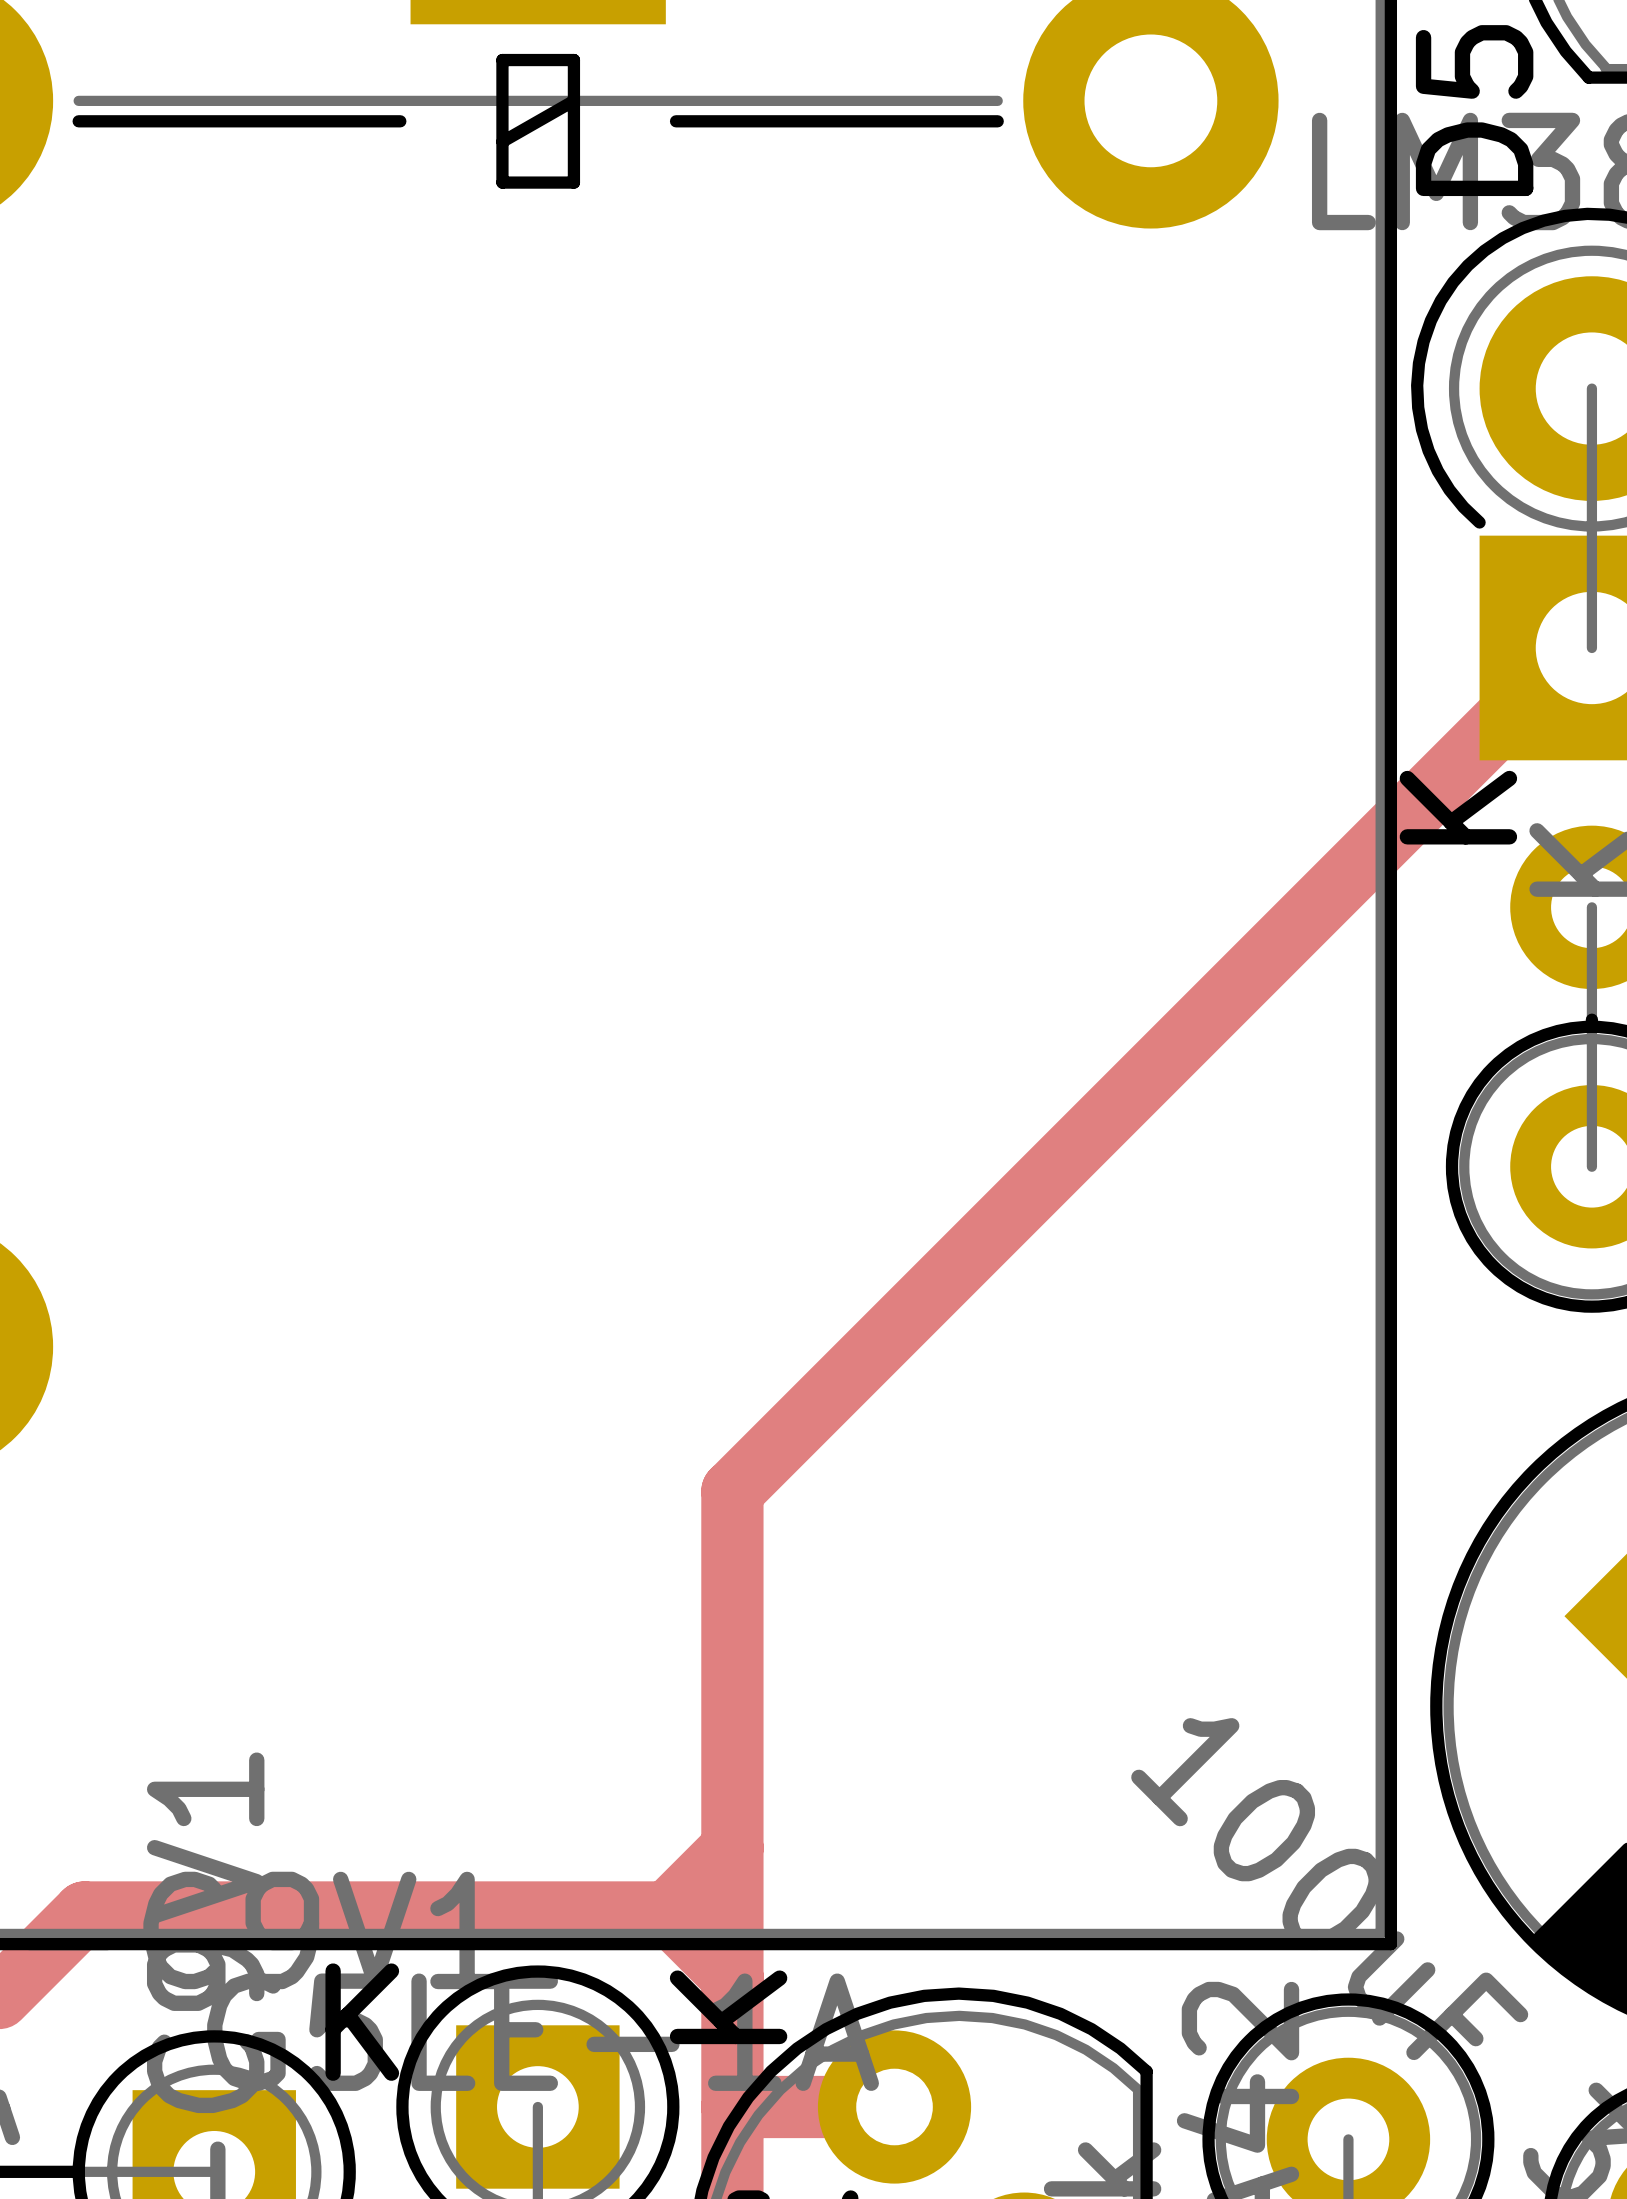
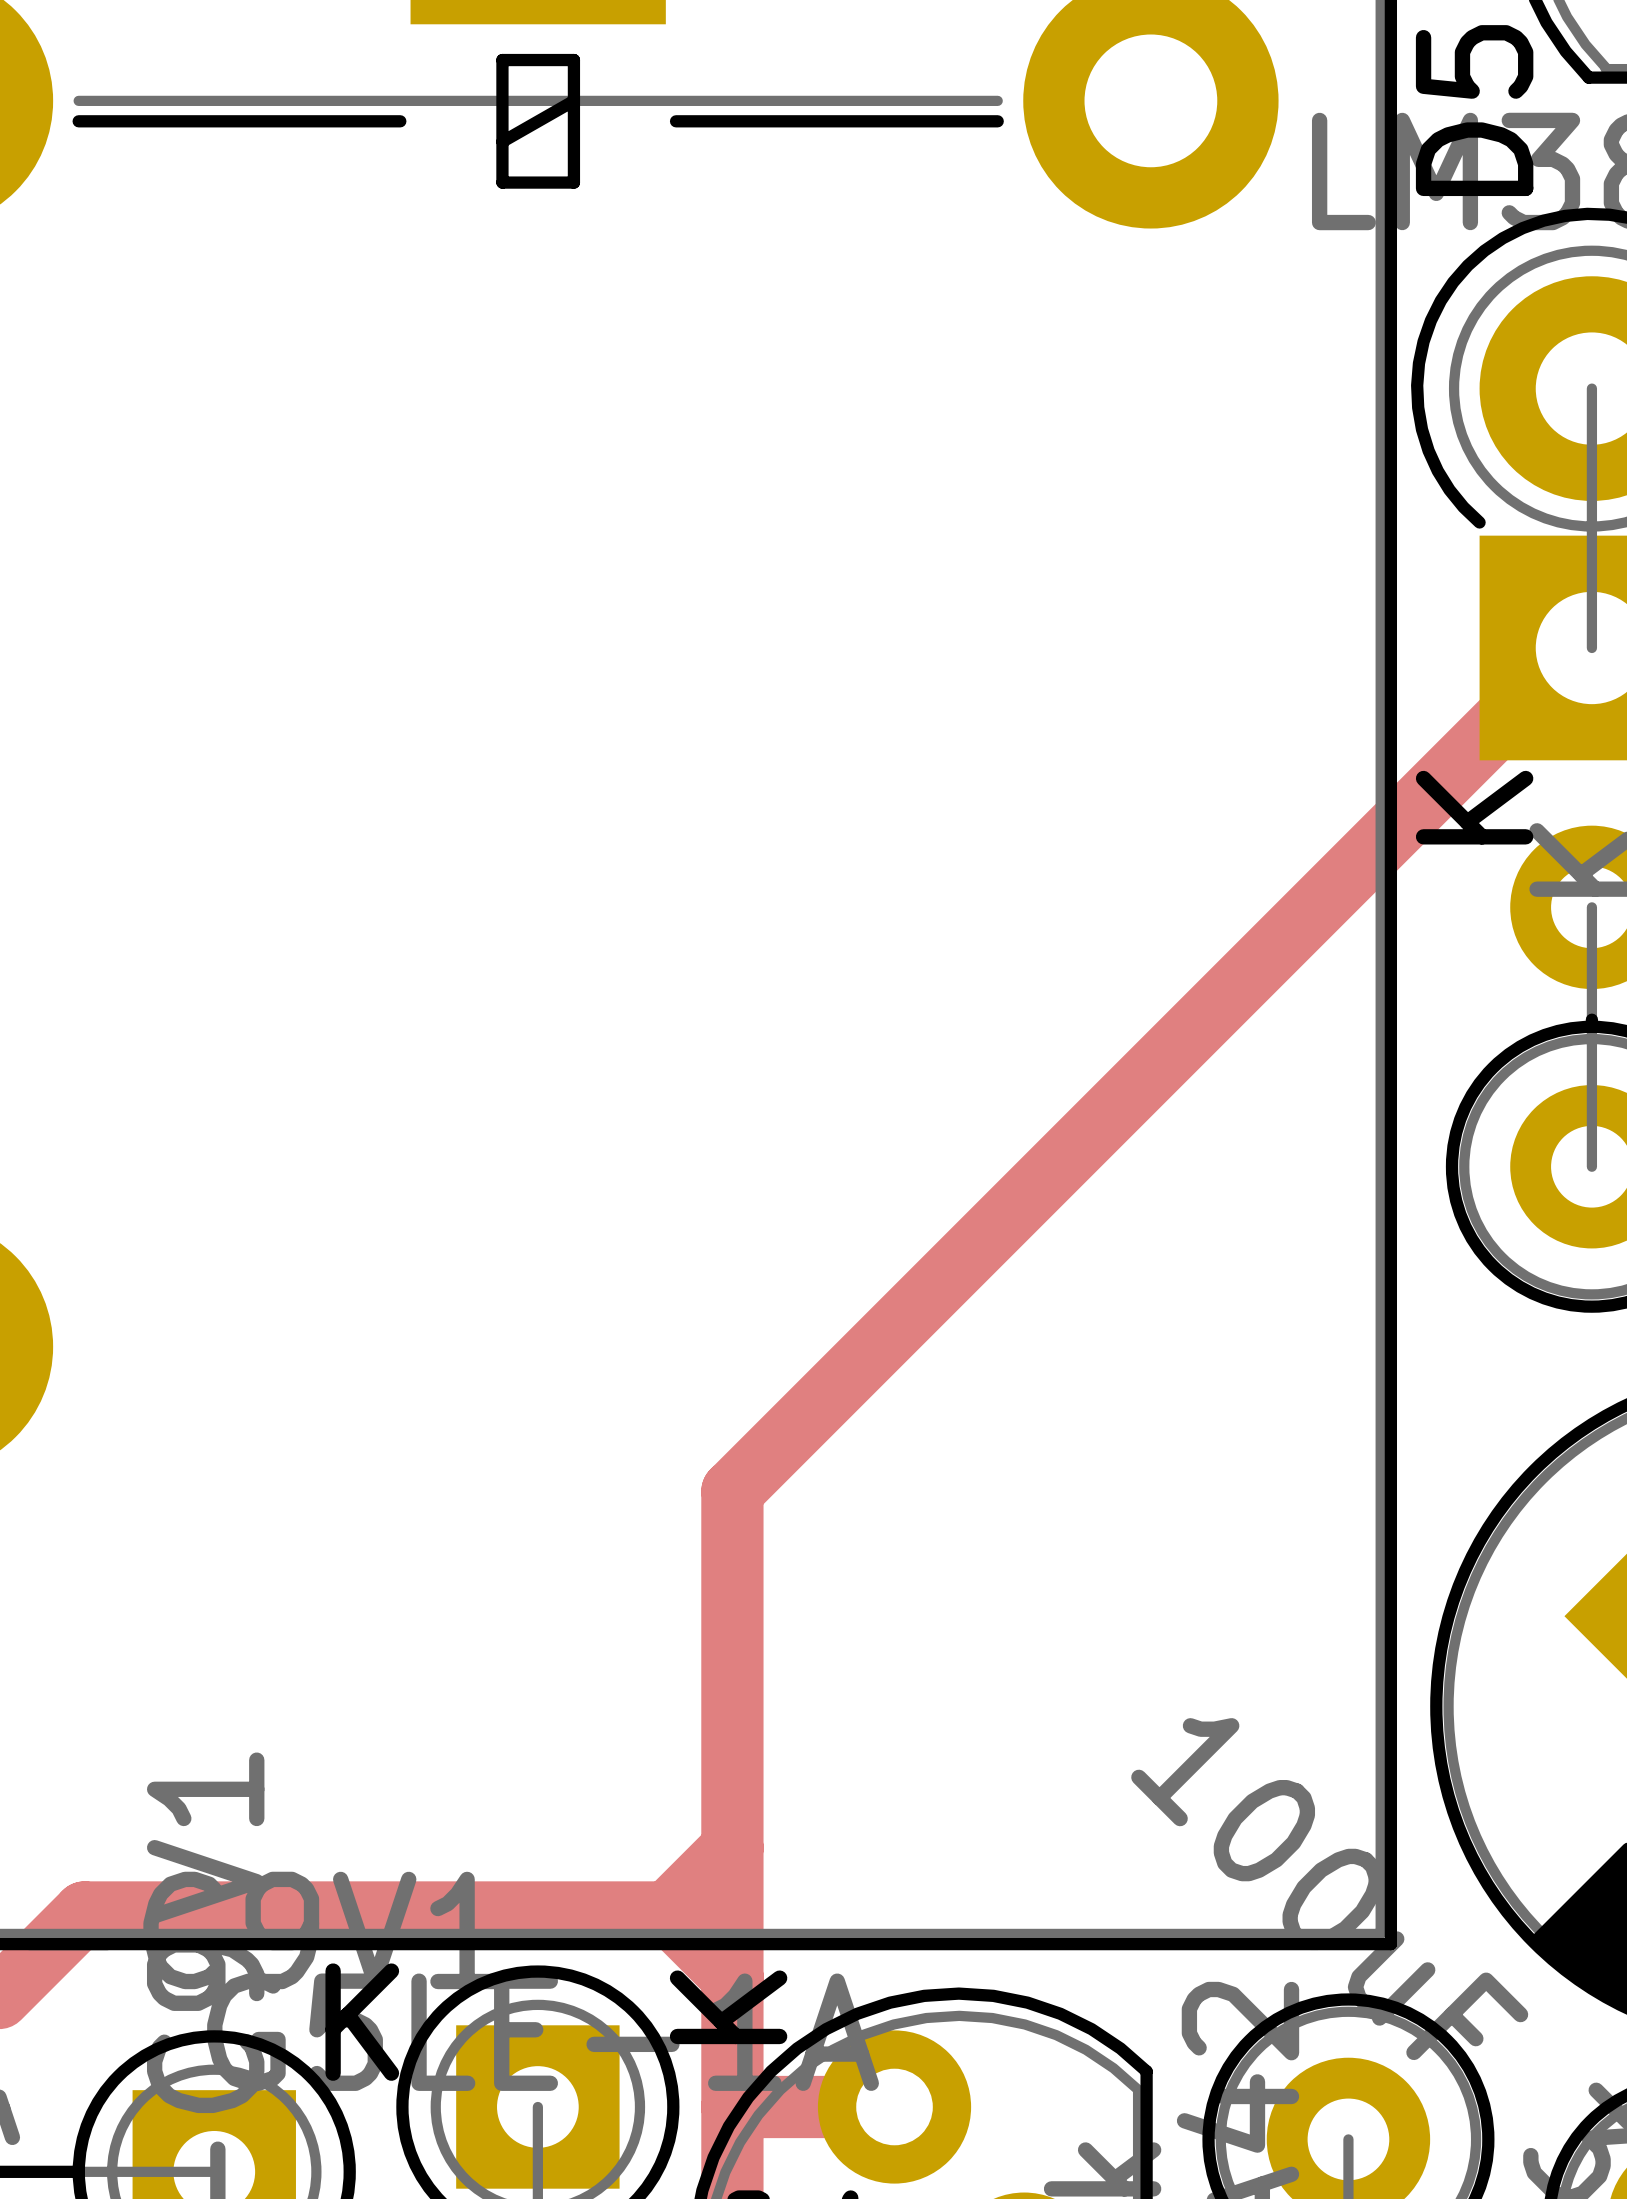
D5 text position: K (1458, 807) -> K (1474, 807)

